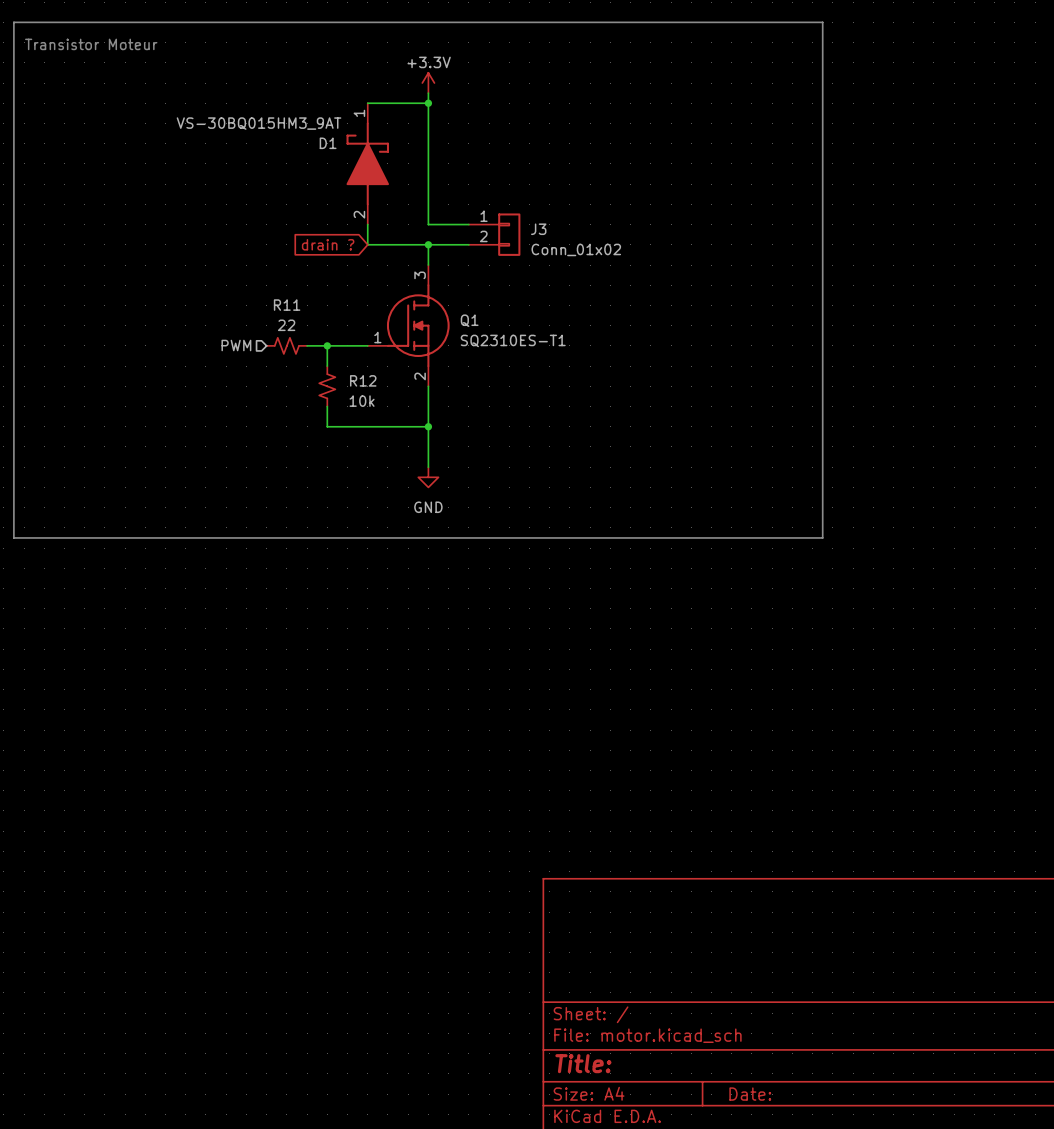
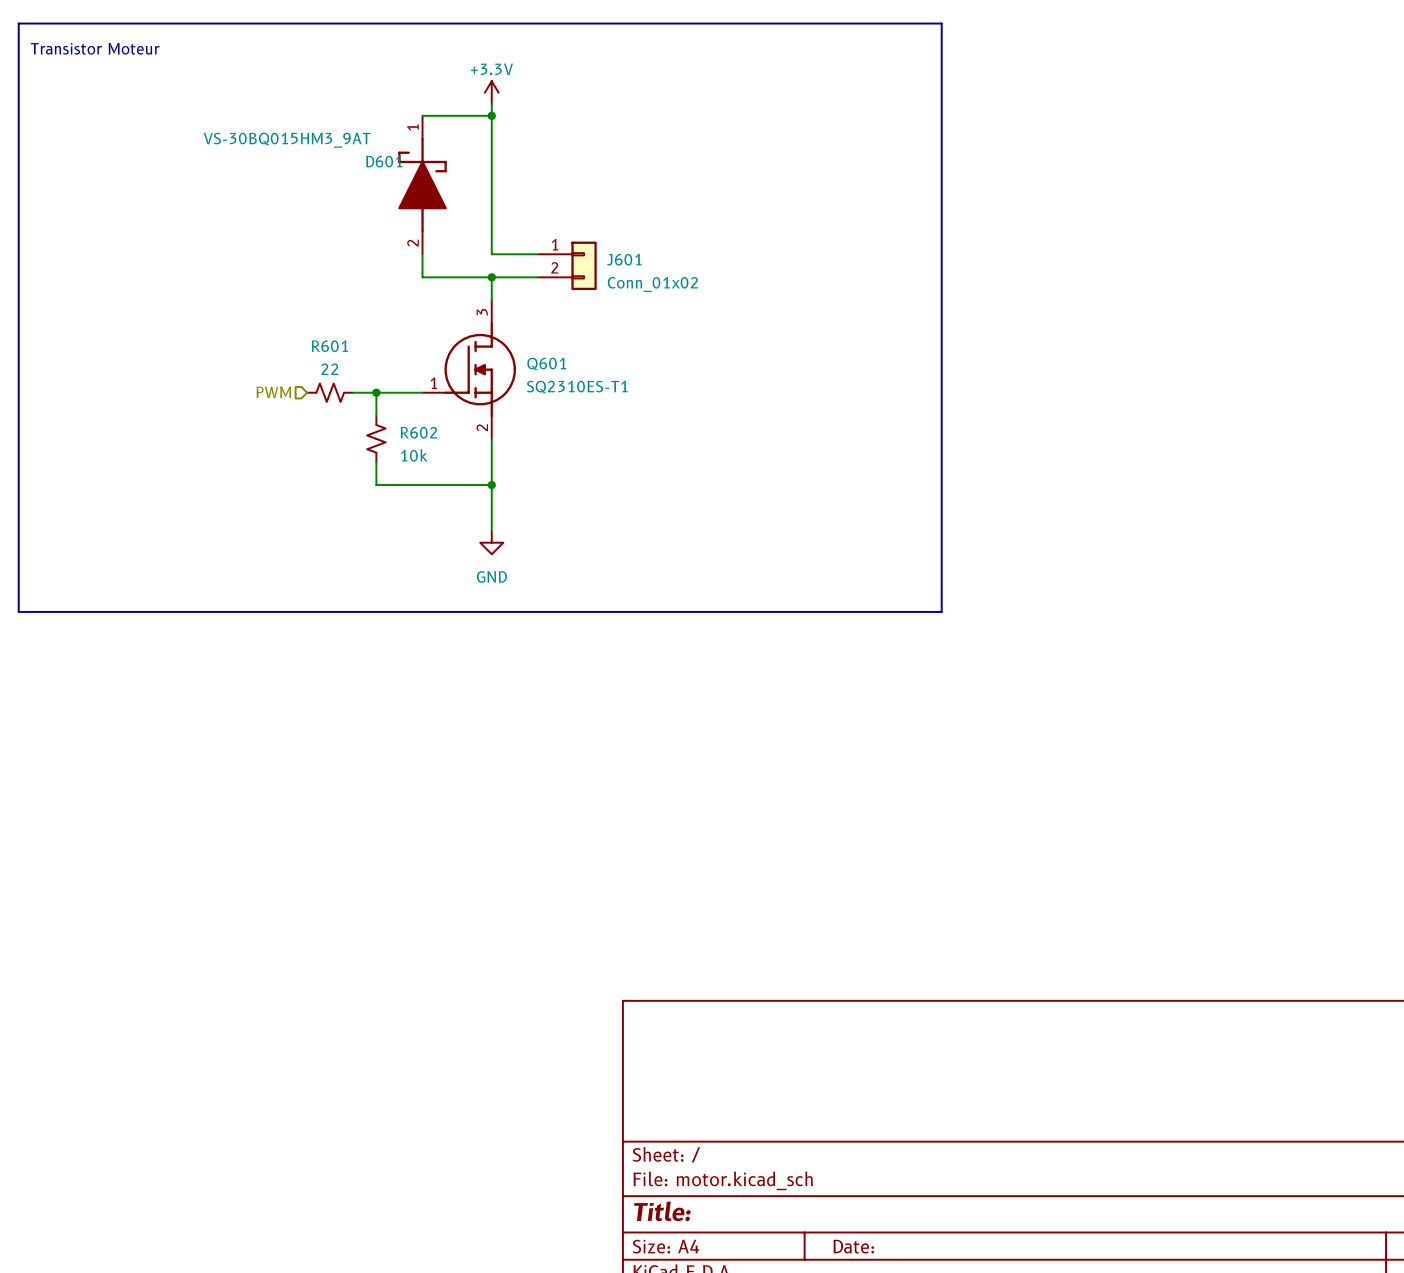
D1 name: D1 (328, 143) -> D601 (384, 161)
J3 name: J3 (538, 229) -> J601 (624, 259)
global label: drain ? (328, 244) -> none
R11 name: R11 (287, 305) -> R601 (329, 346)
Q1 name: Q1 (469, 320) -> Q601 (546, 364)
R12 name: R12 (363, 380) -> R602 (418, 432)

